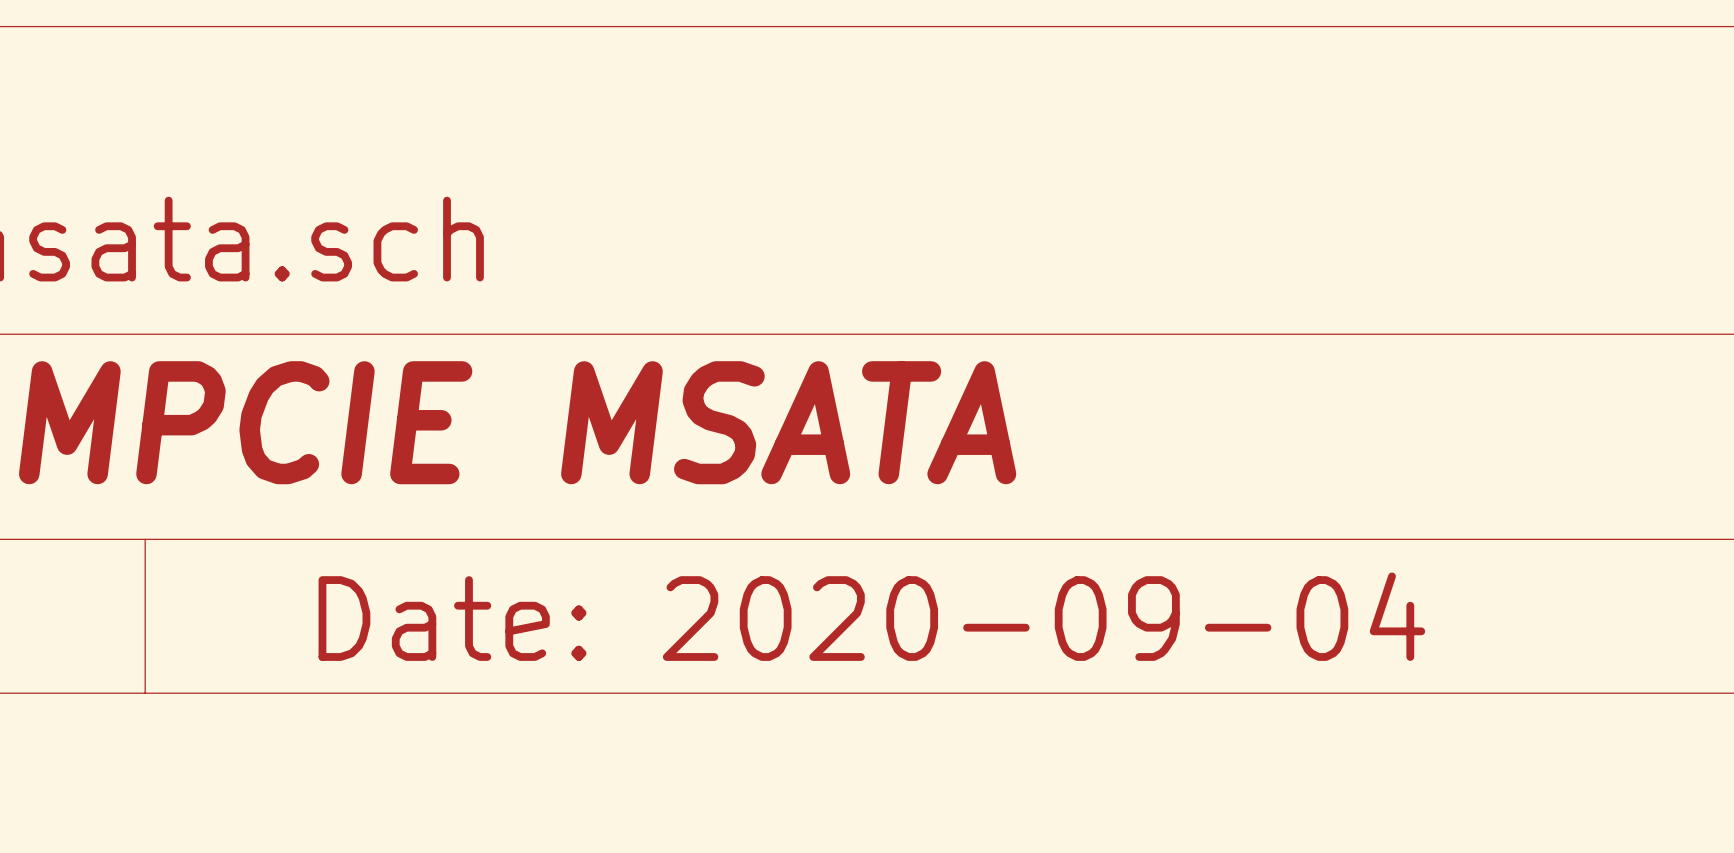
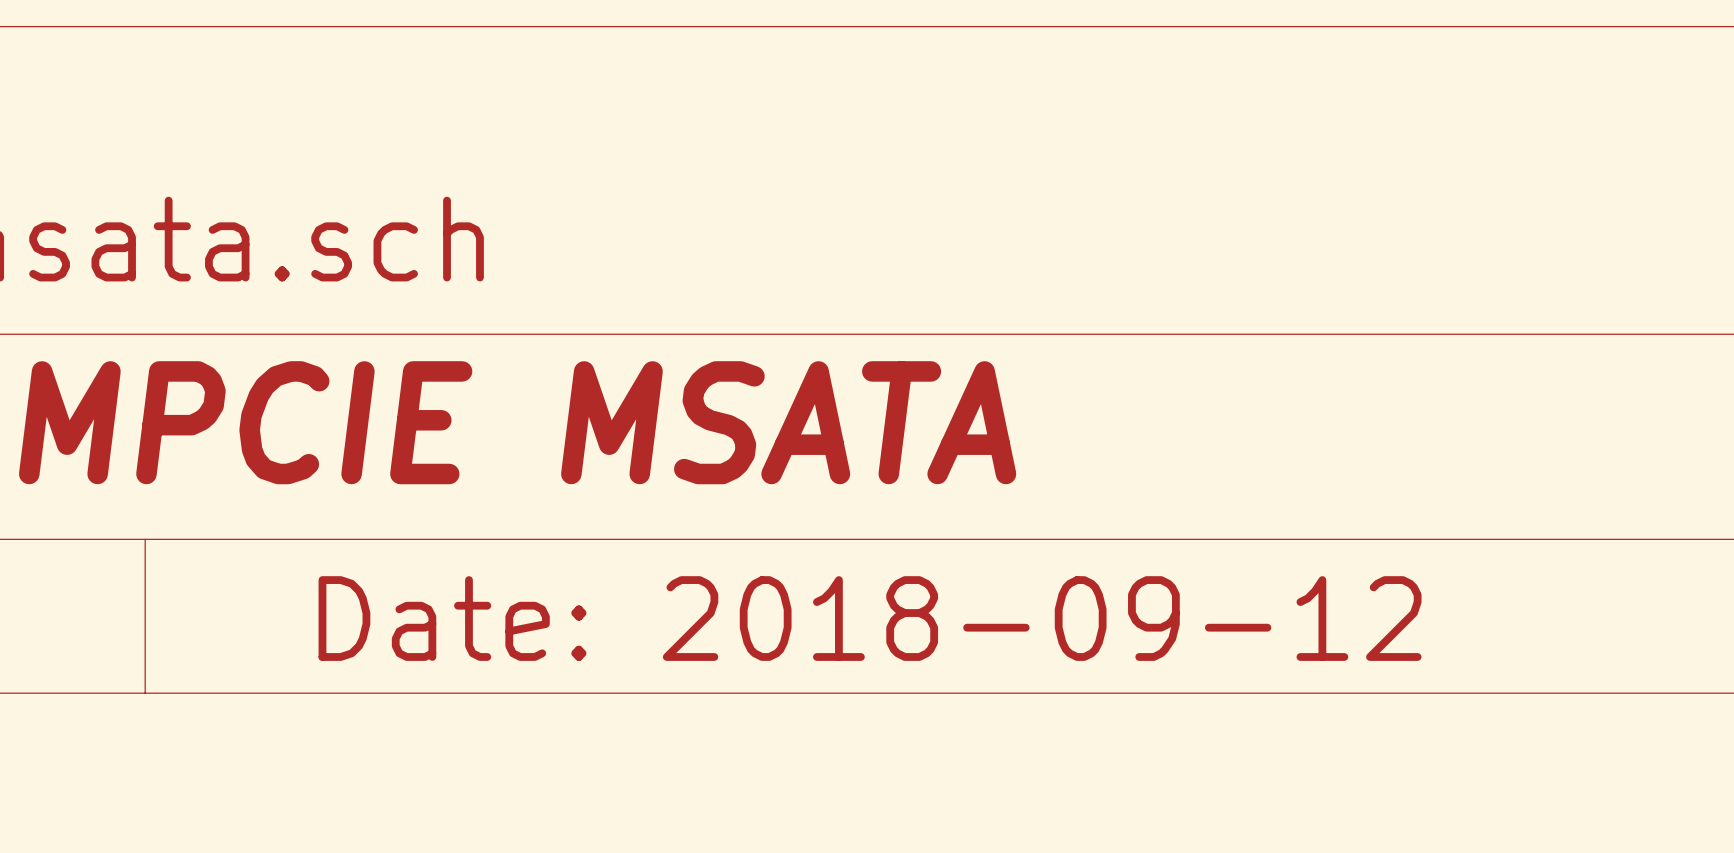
title block: Date: 2020-09-04 (871, 616) -> Date: 2018-09-12 (870, 618)

